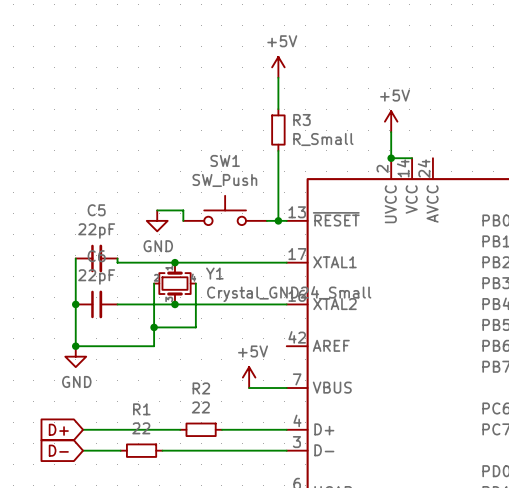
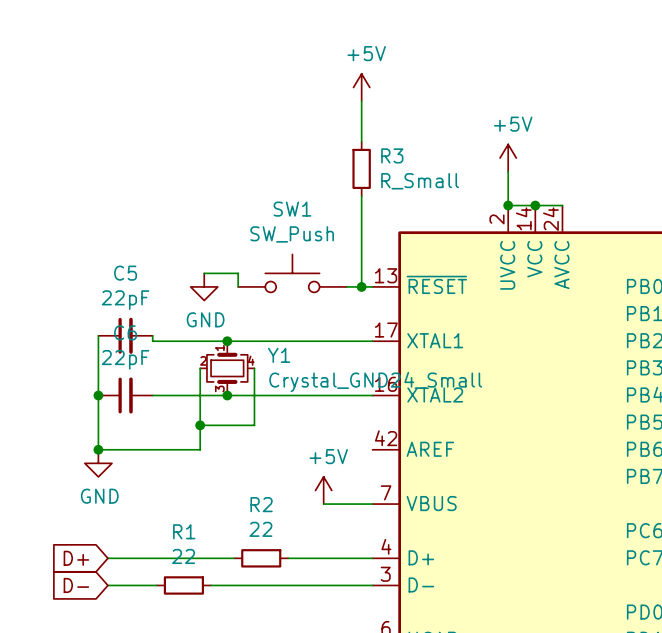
wire: none -> (535, 205) (562, 205)
junction: none -> (535, 205)

